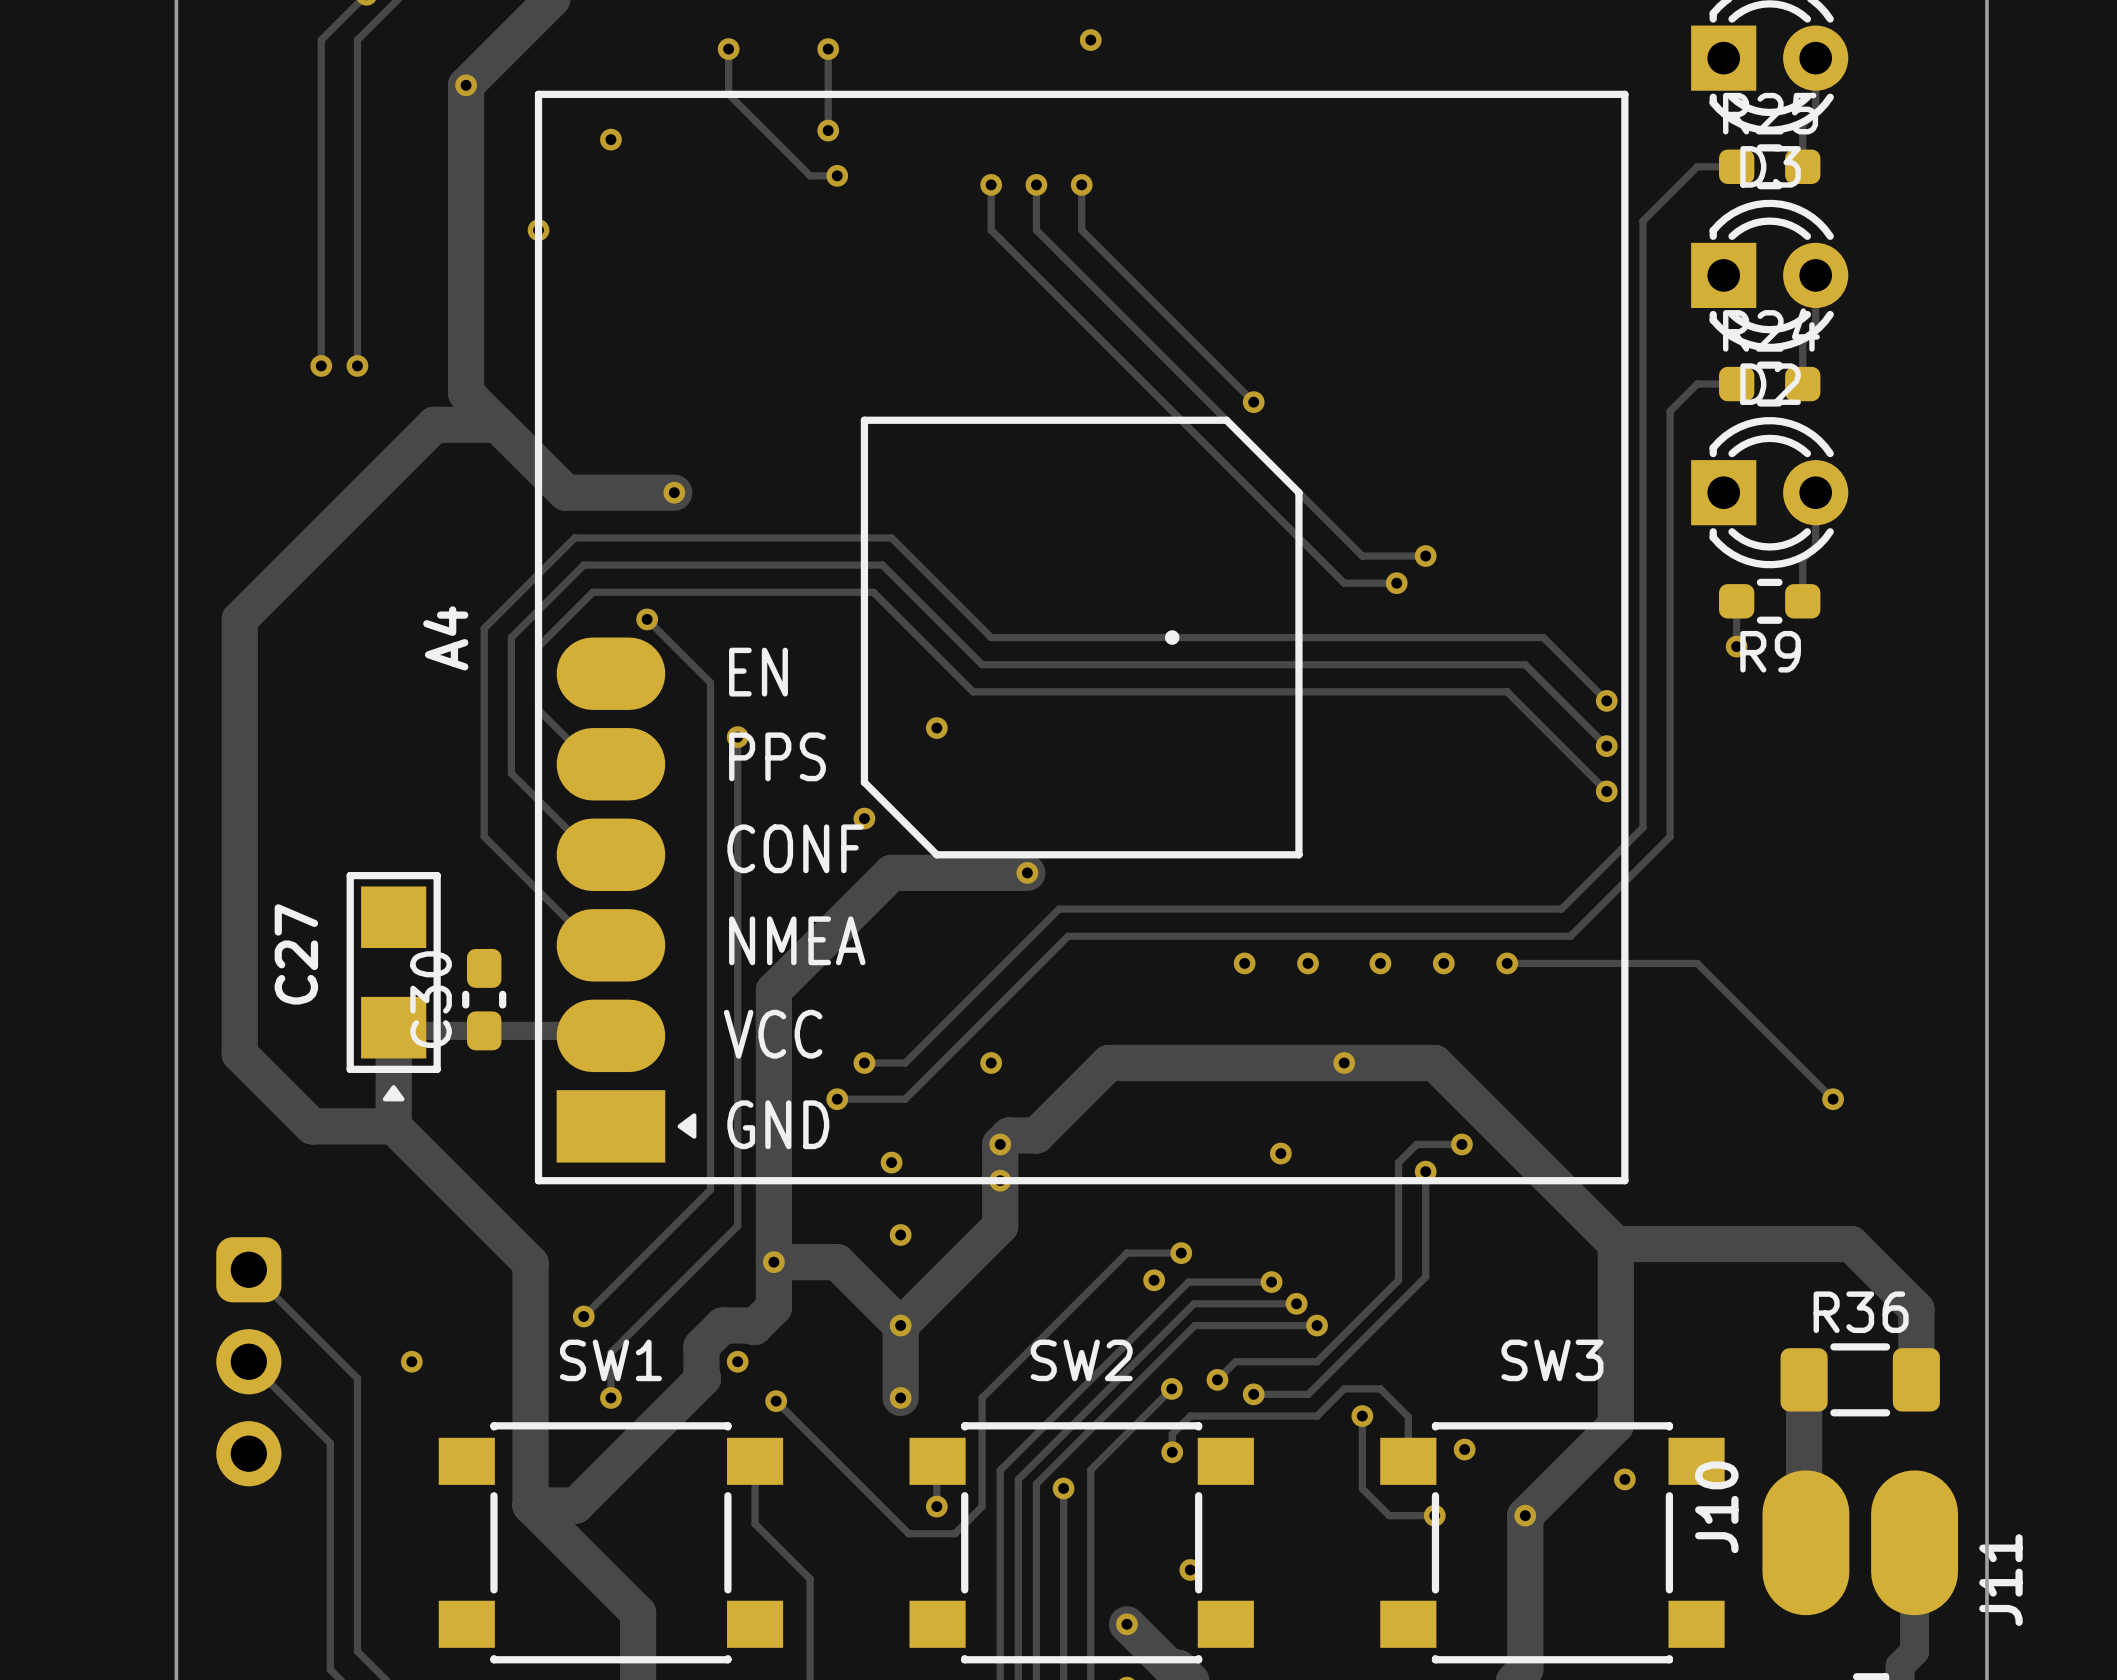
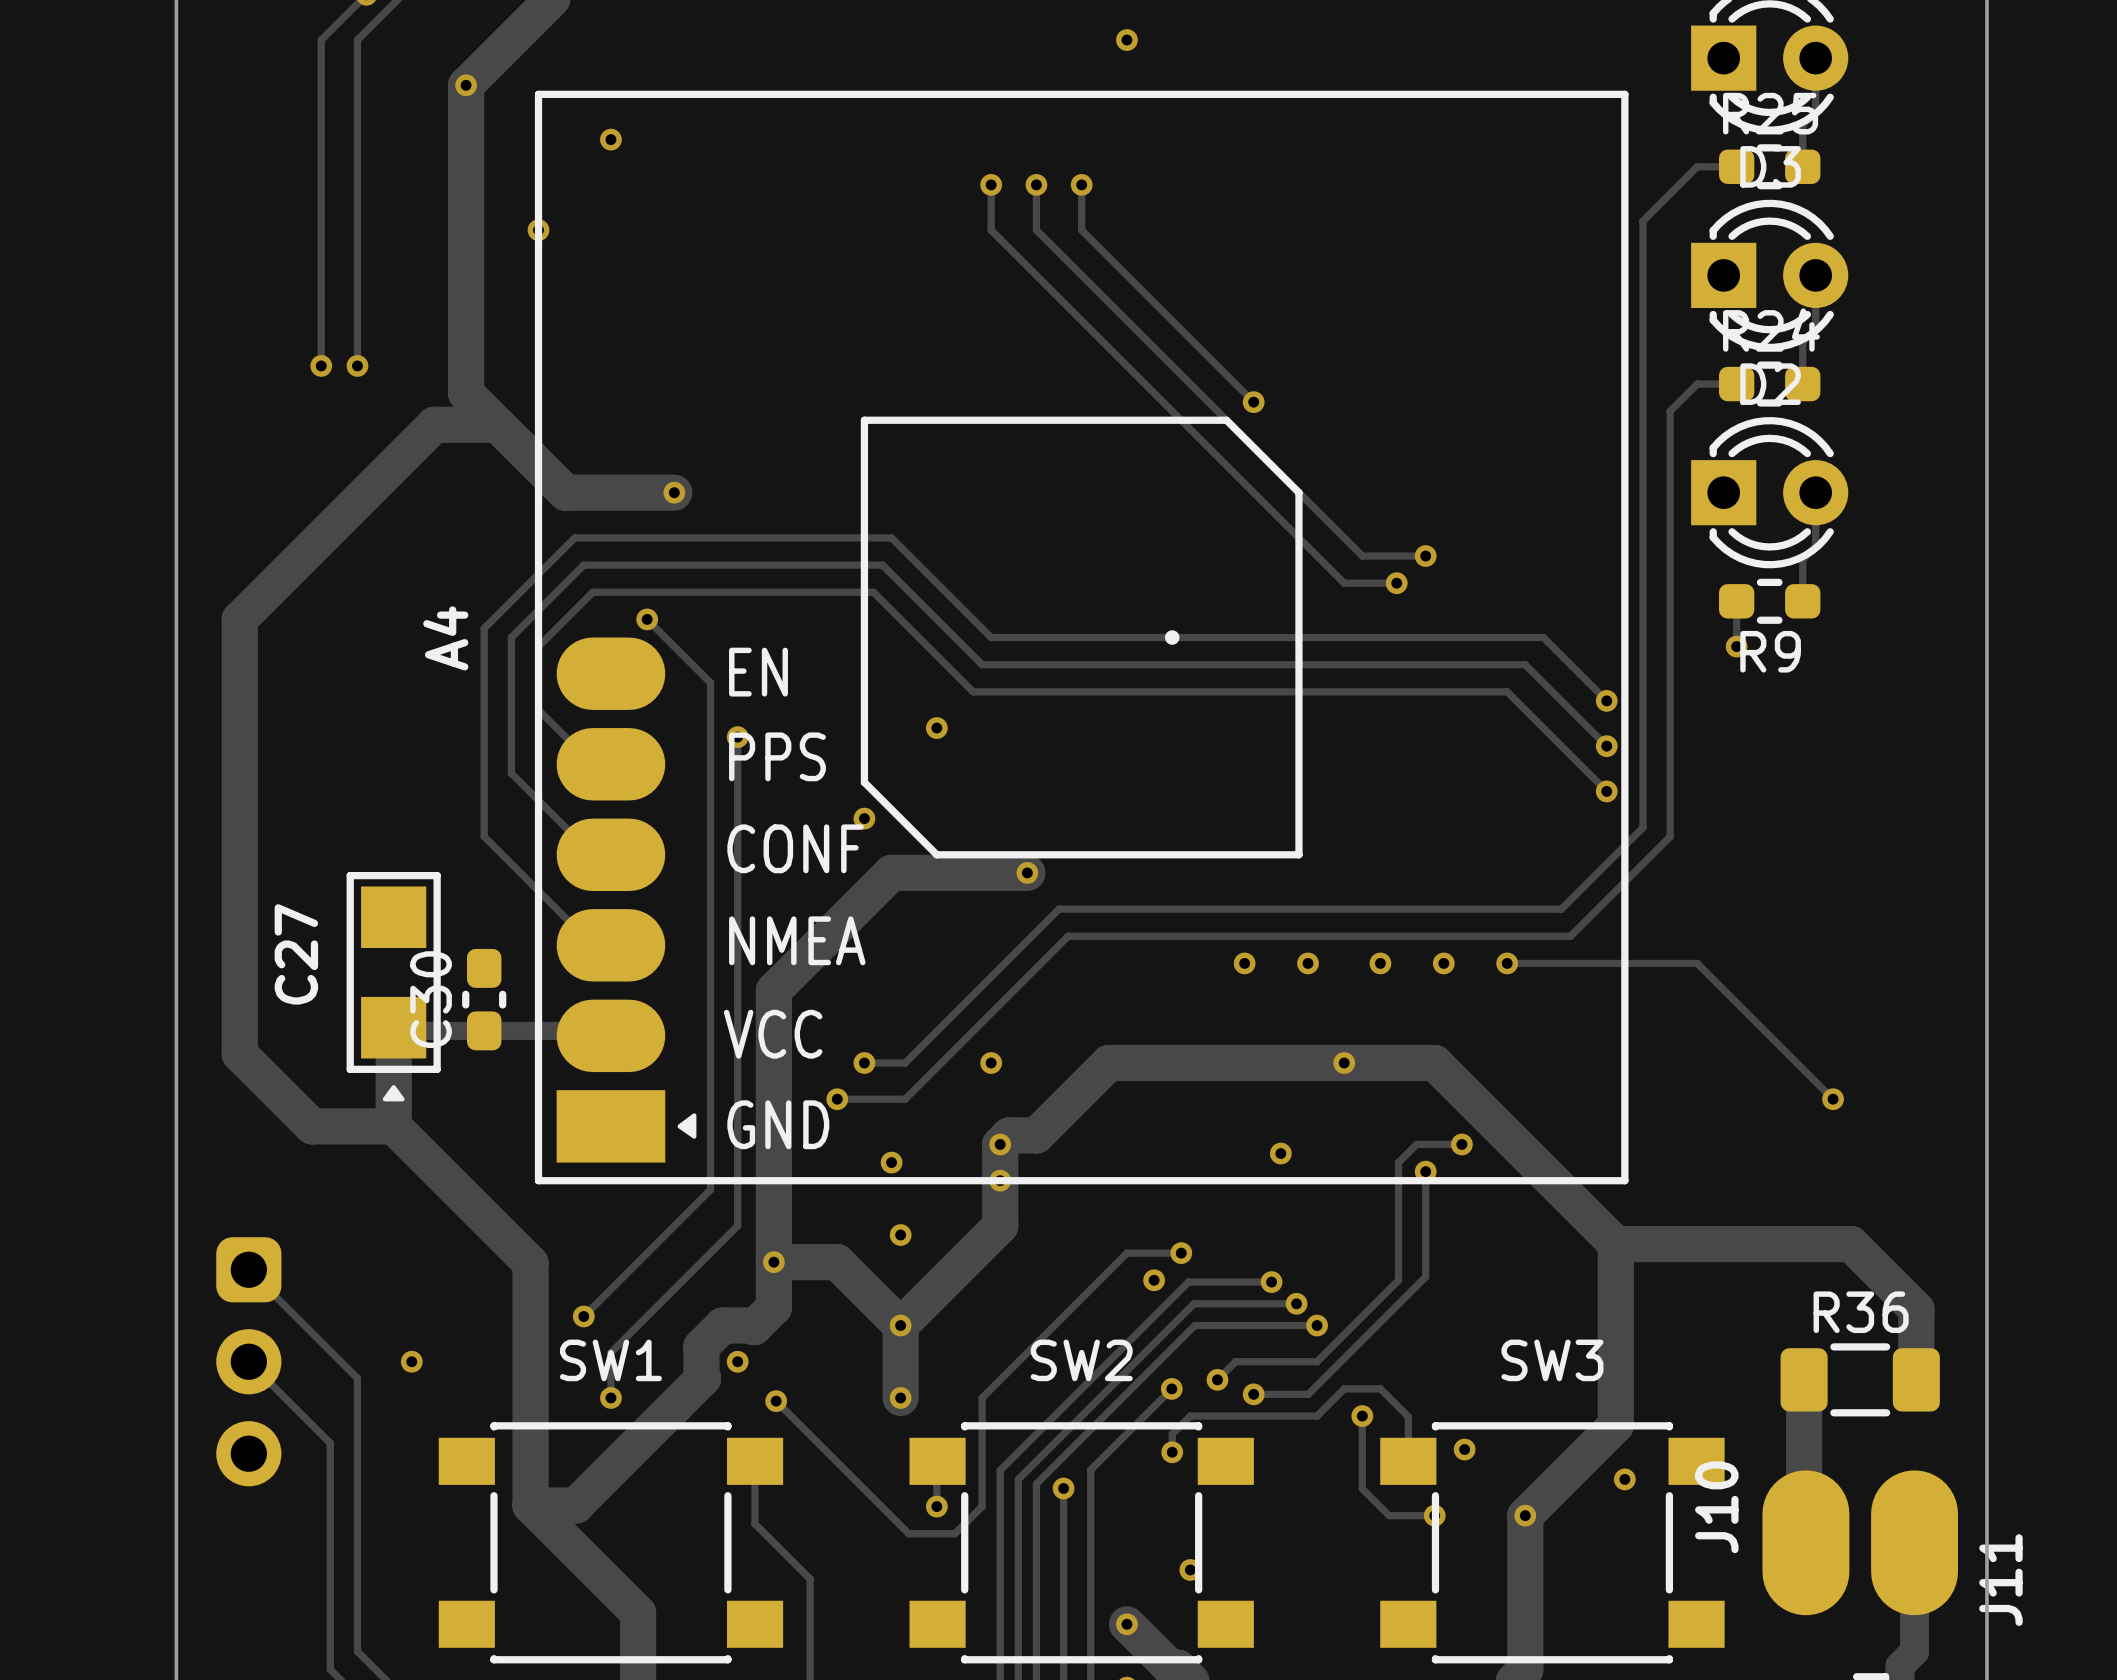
via position: (1090, 40) -> (1126, 40)
track: (728, 49) (728, 94) (810, 175) (837, 175) -> none
via: (728, 49) -> none
track: (828, 49) (828, 130) -> none
via: (828, 49) -> none
via: (828, 130) -> none
via: (837, 175) -> none

